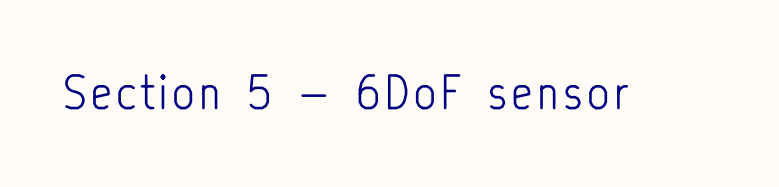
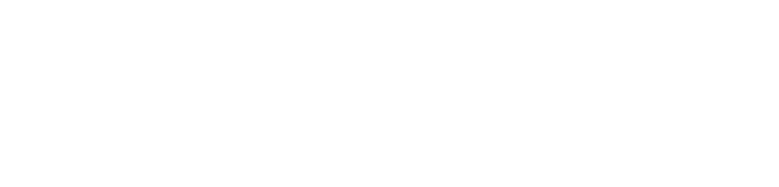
text: Section 5 - 6DoF sensor (346, 91) -> none

